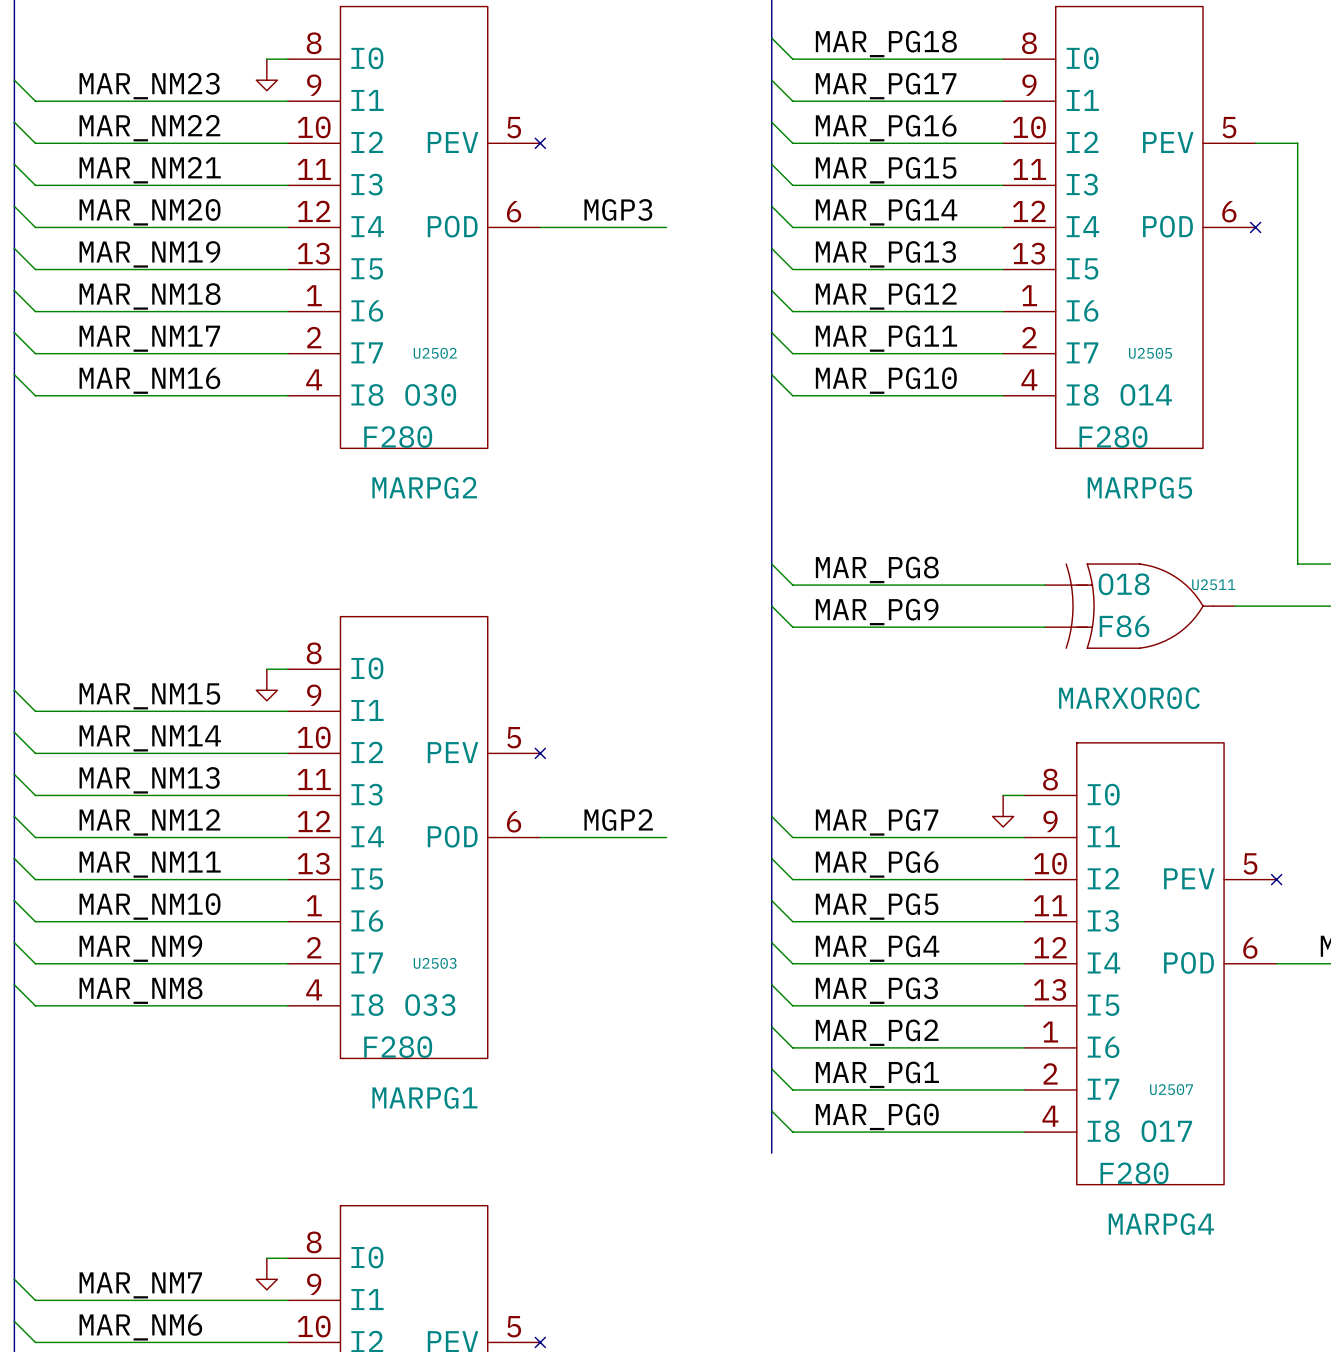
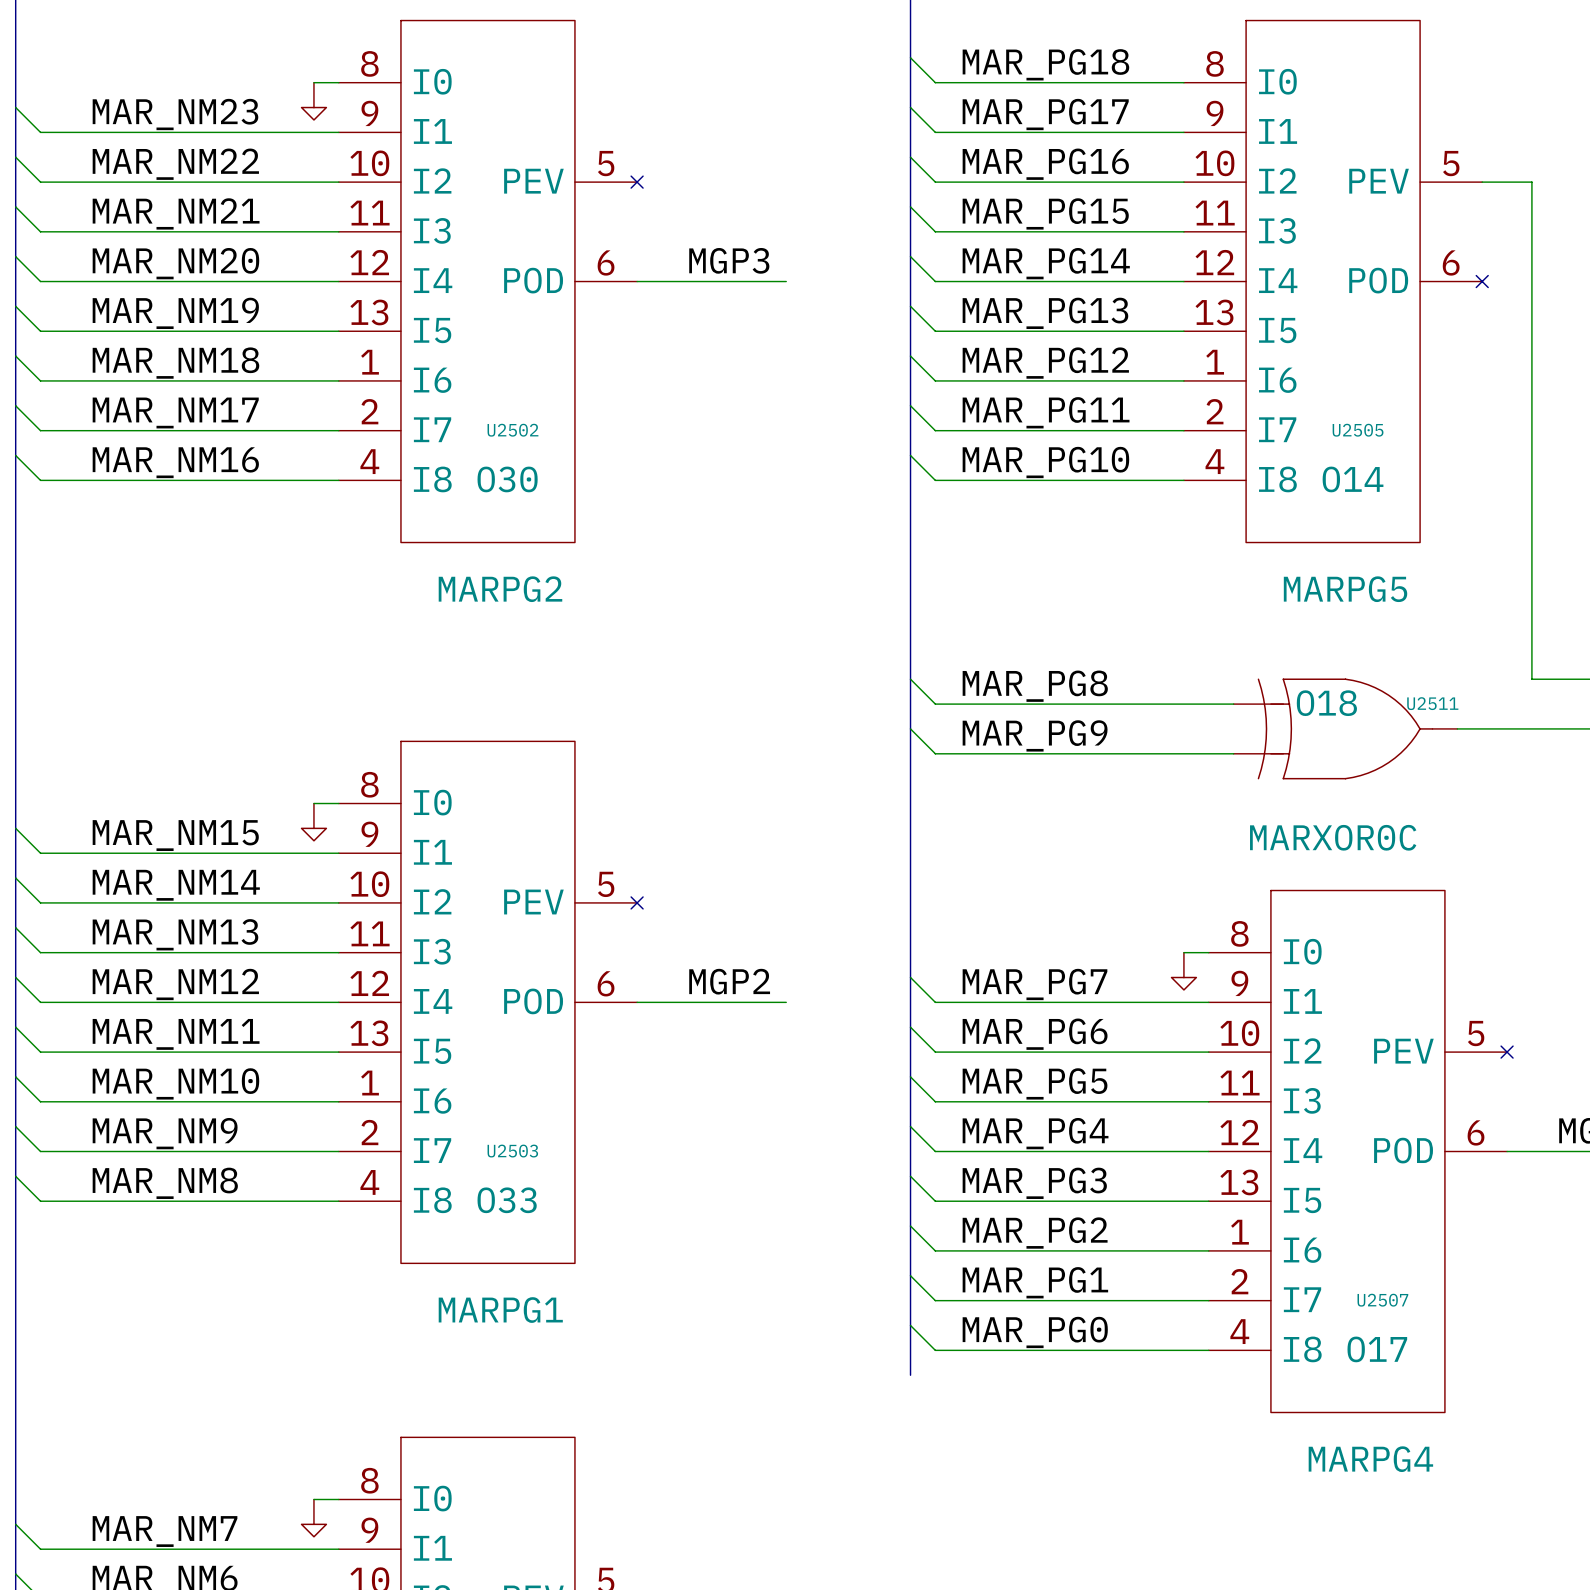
U2502 value: F280 (398, 437) -> none
U2505 value: F280 (1113, 437) -> none
U2511 value: F86 (1124, 626) -> none
U2503 value: F280 (398, 1047) -> none
U2507 value: F280 (1134, 1173) -> none

